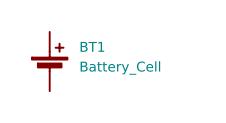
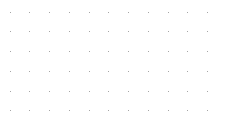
BT1: Battery_Cell (49, 61) -> none

